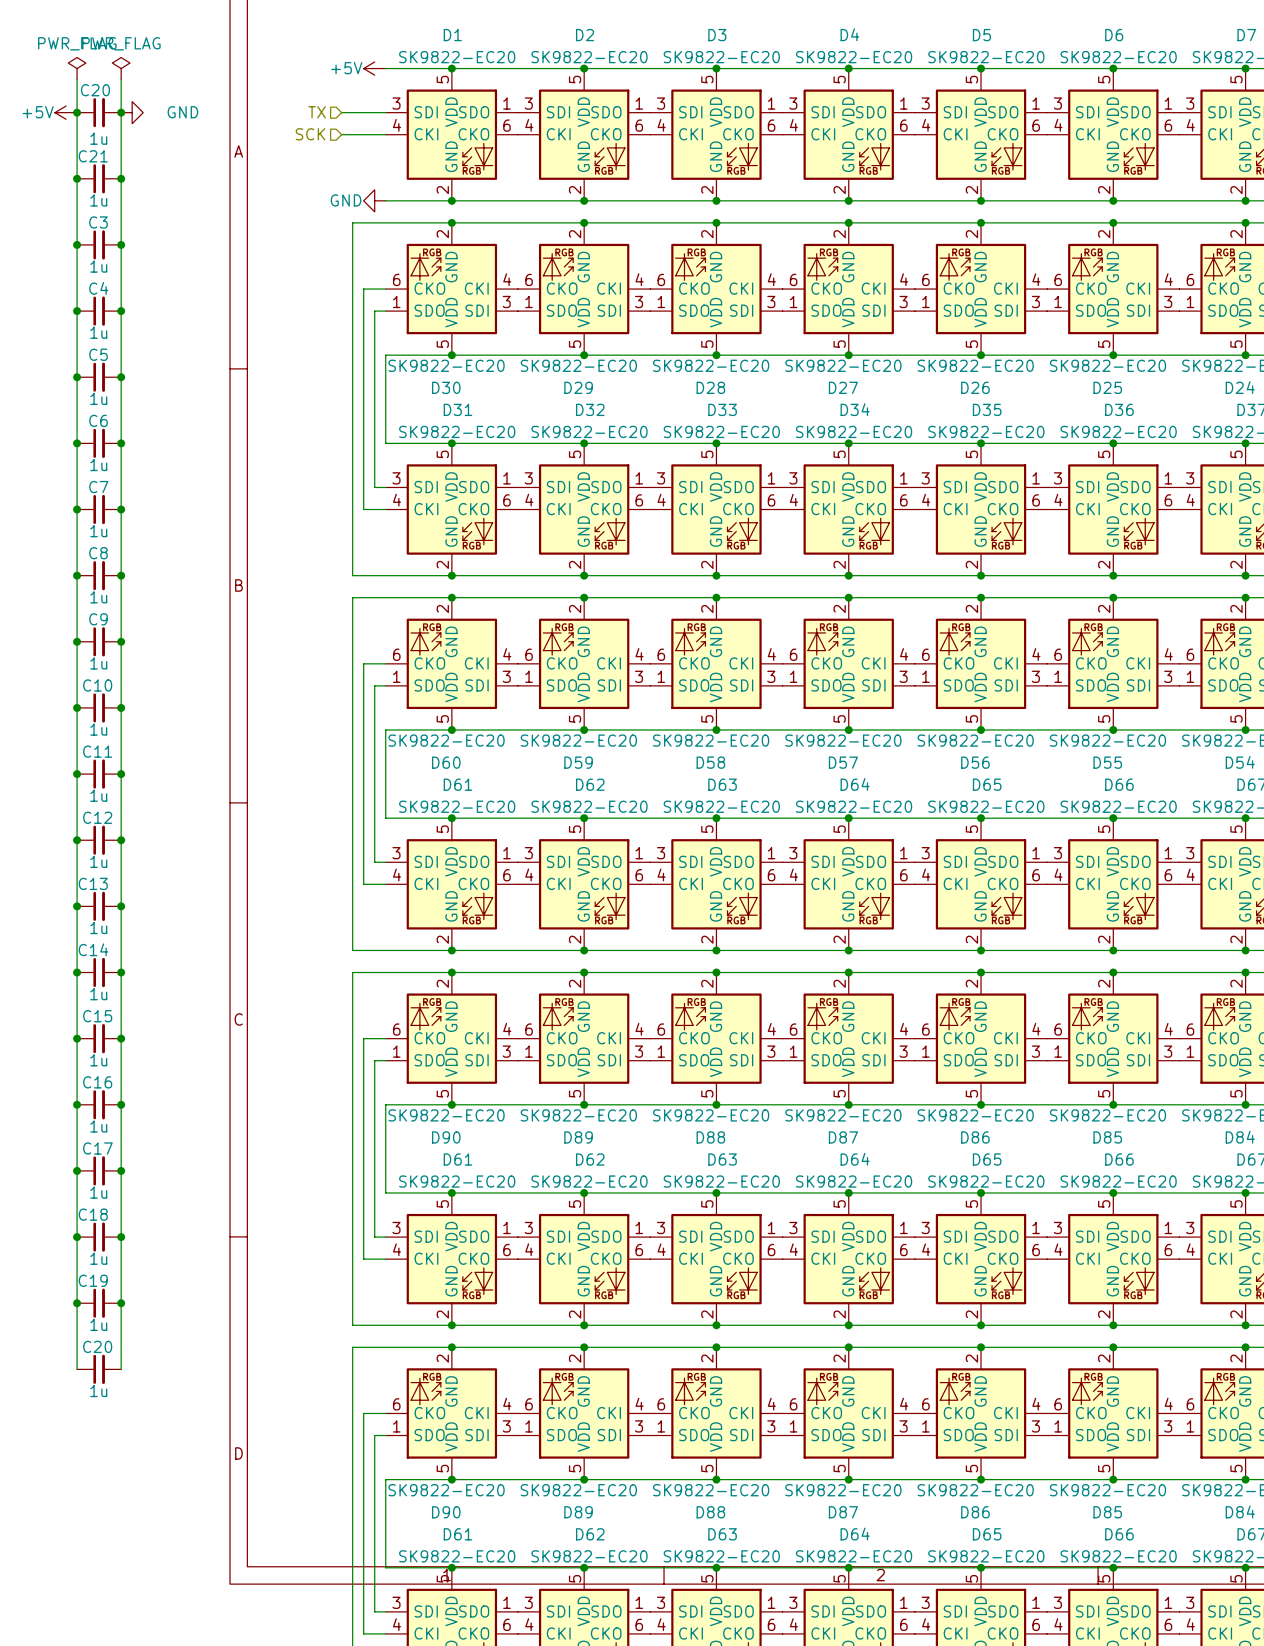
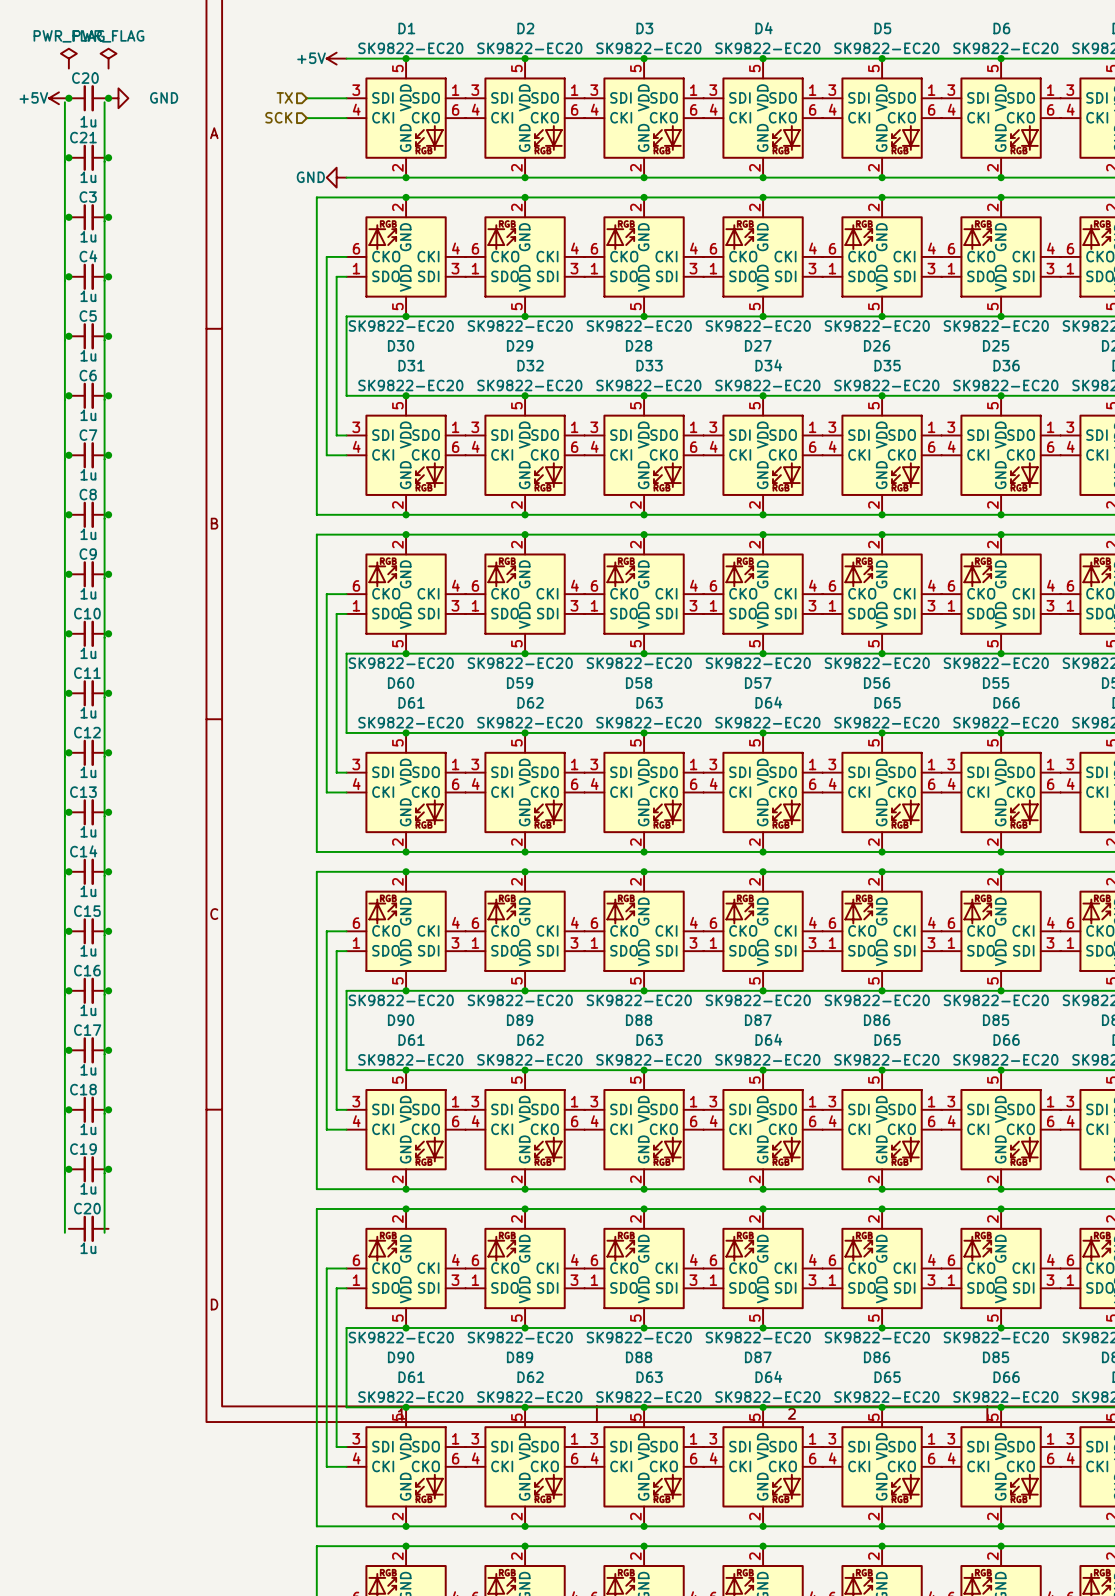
wire: (77, 79) (77, 1369) -> none
wire: (121, 79) (121, 1369) -> none
wire: none -> (64, 102) (64, 1232)
wire: none -> (104, 102) (104, 1232)

